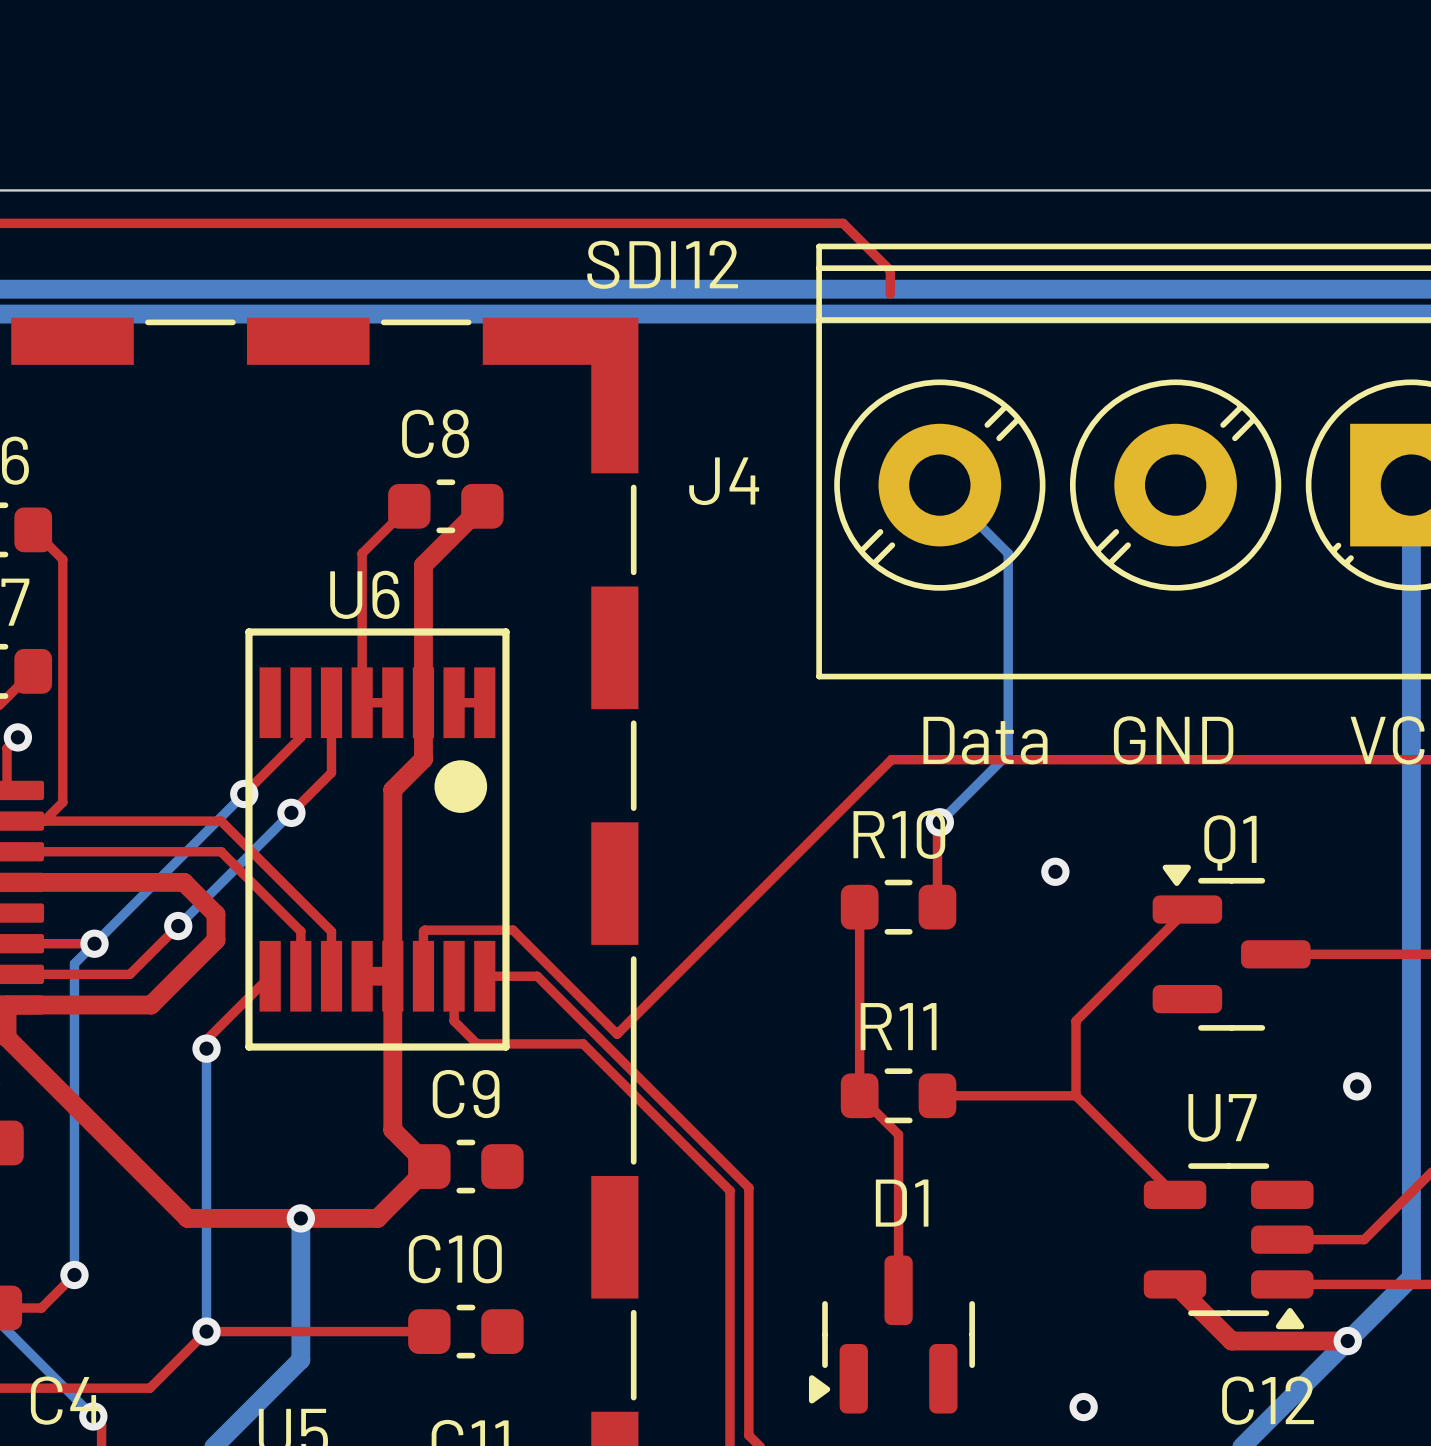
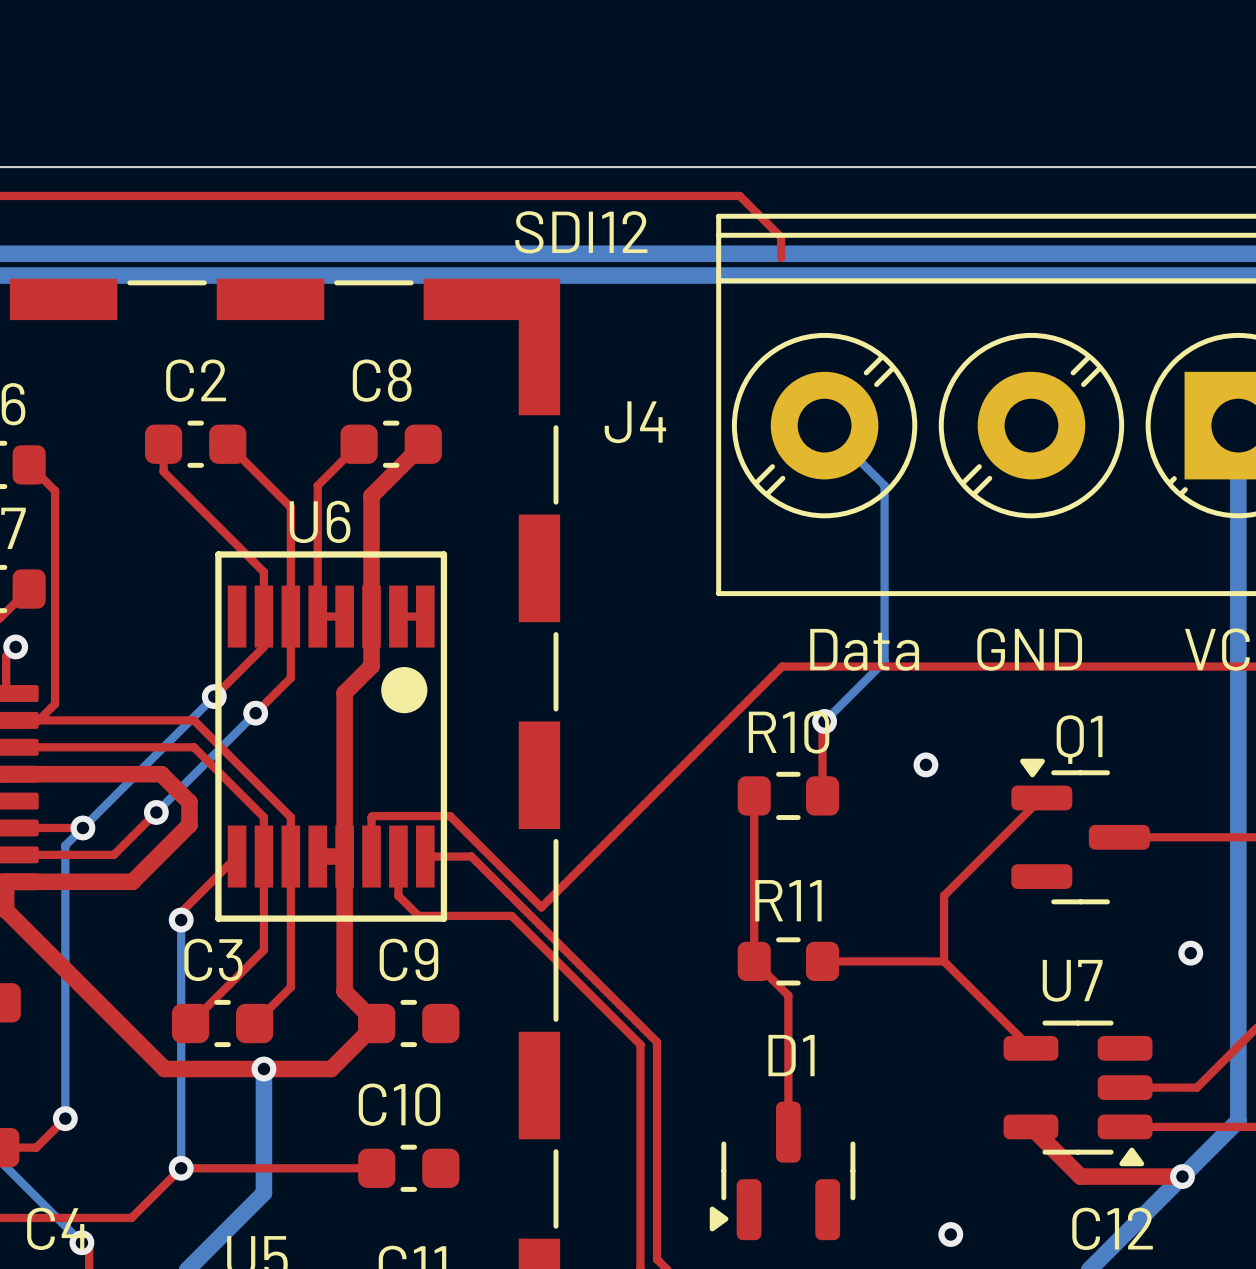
top track: none -> (163, 444) (163, 471) (263, 572) (263, 616)
C2: none -> (195, 444)
top track: none -> (227, 444) (290, 507) (290, 616)
top track: none -> (263, 856) (263, 950) (190, 1023)
top track: none -> (290, 856) (290, 987) (254, 1023)
C3: none -> (222, 1023)

